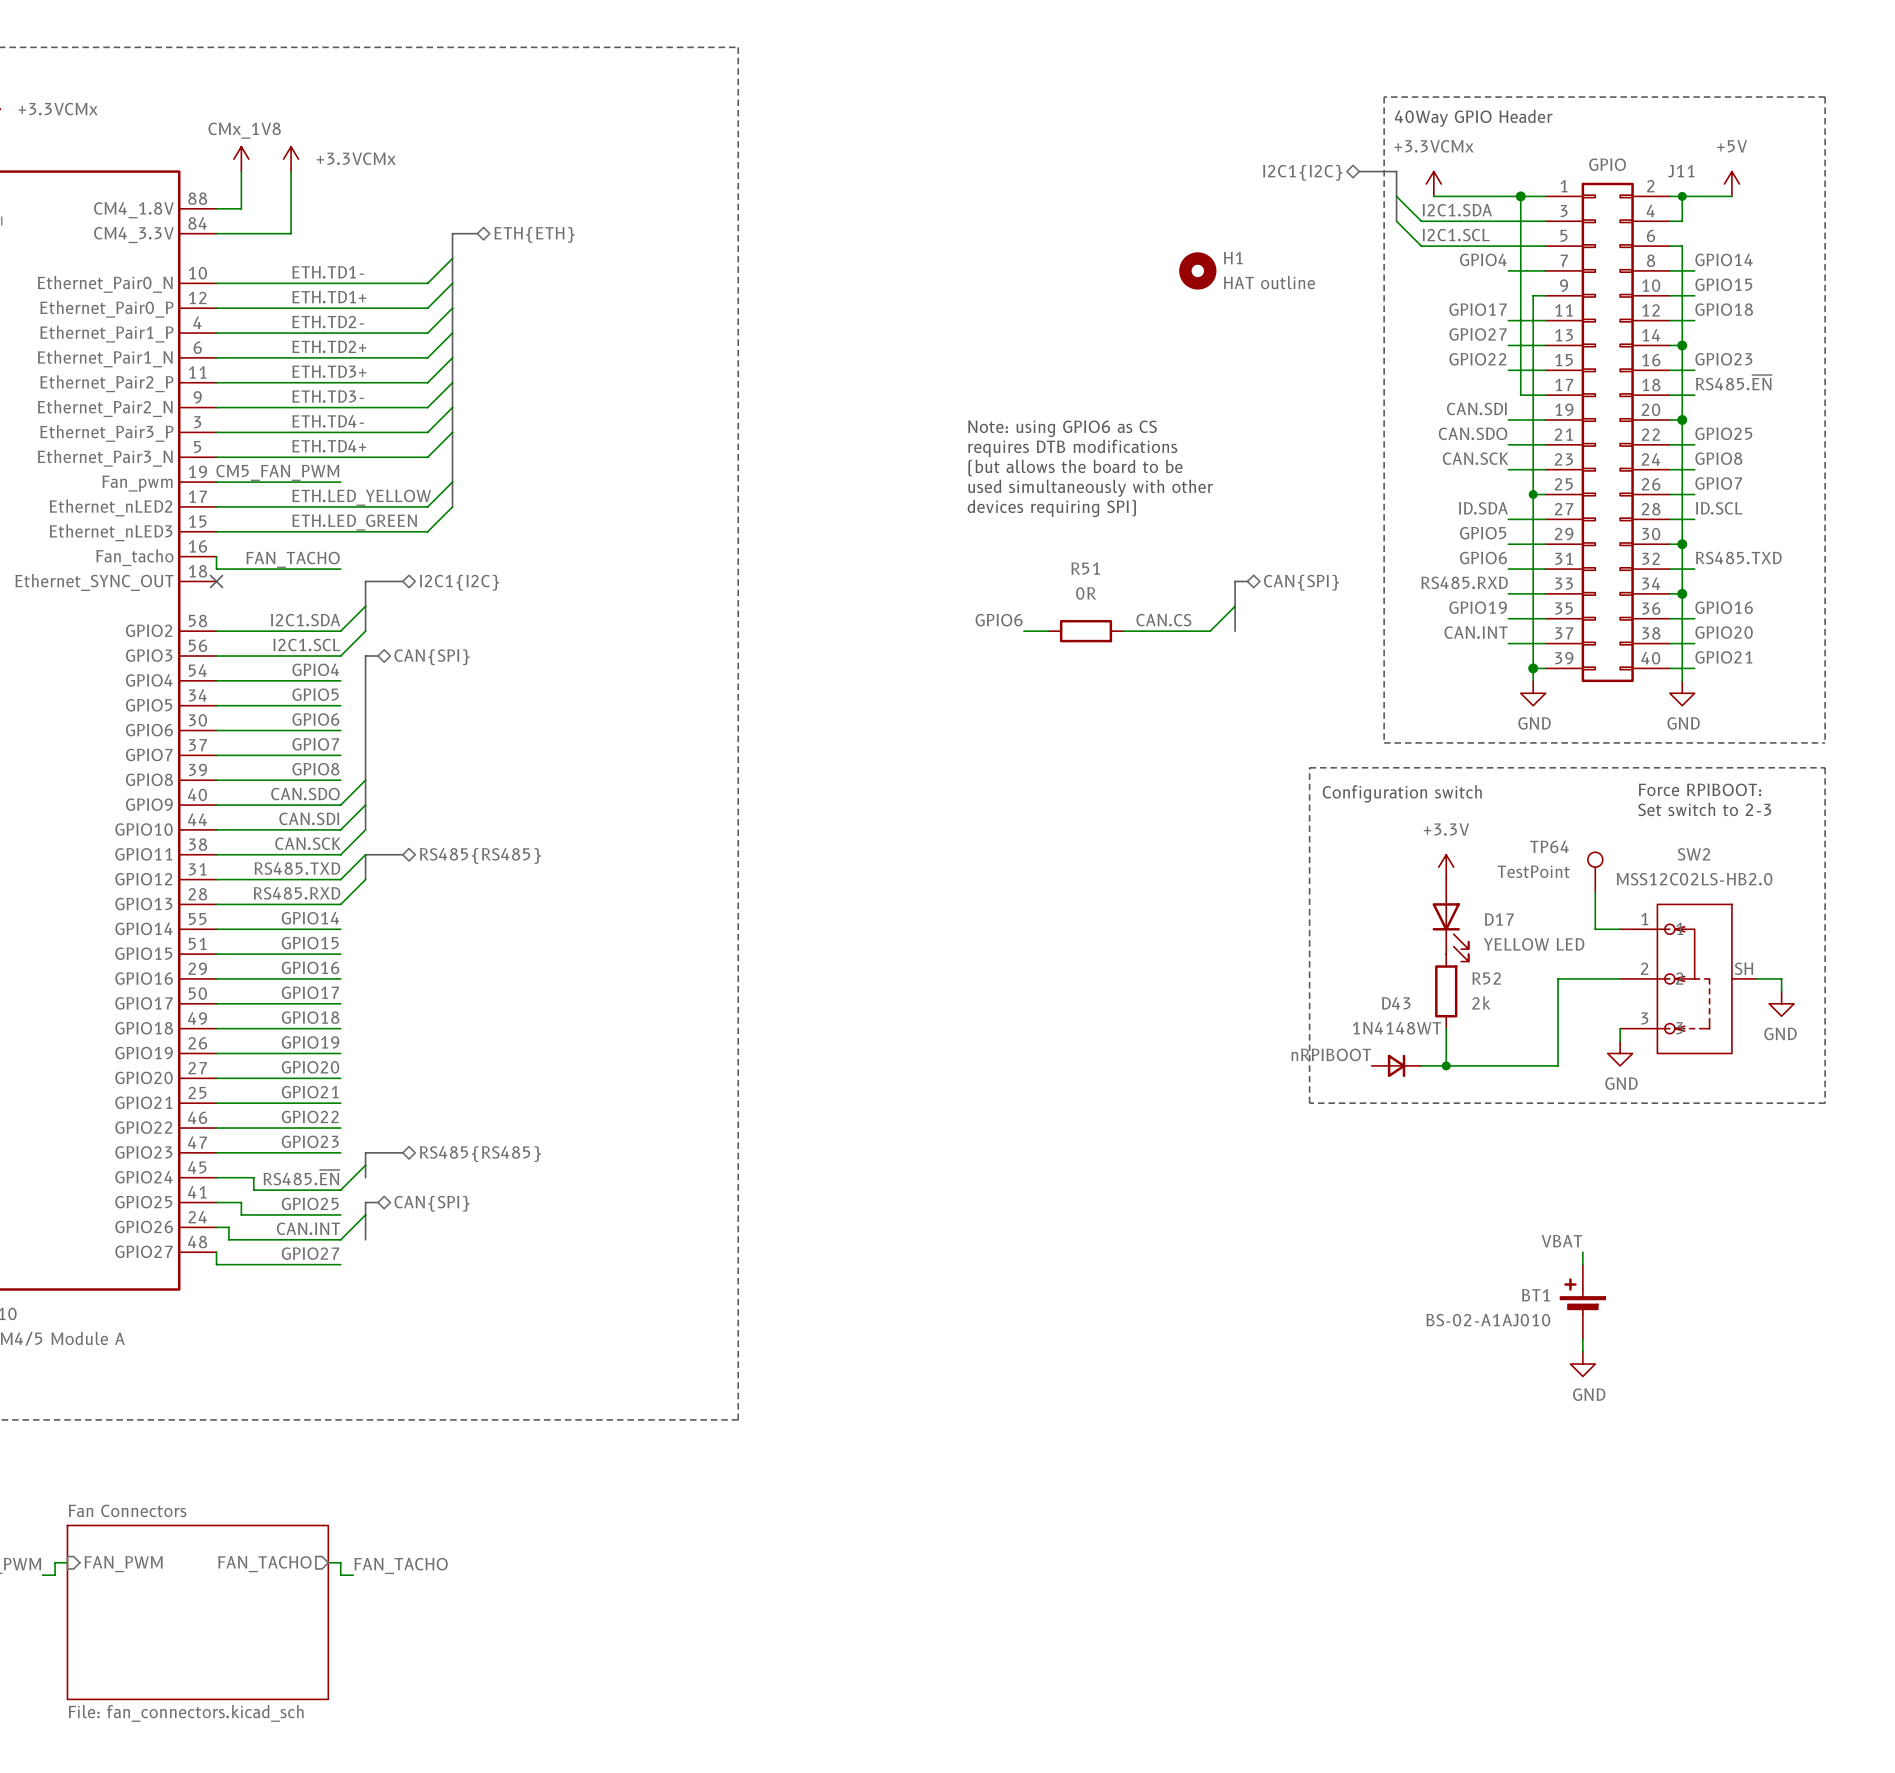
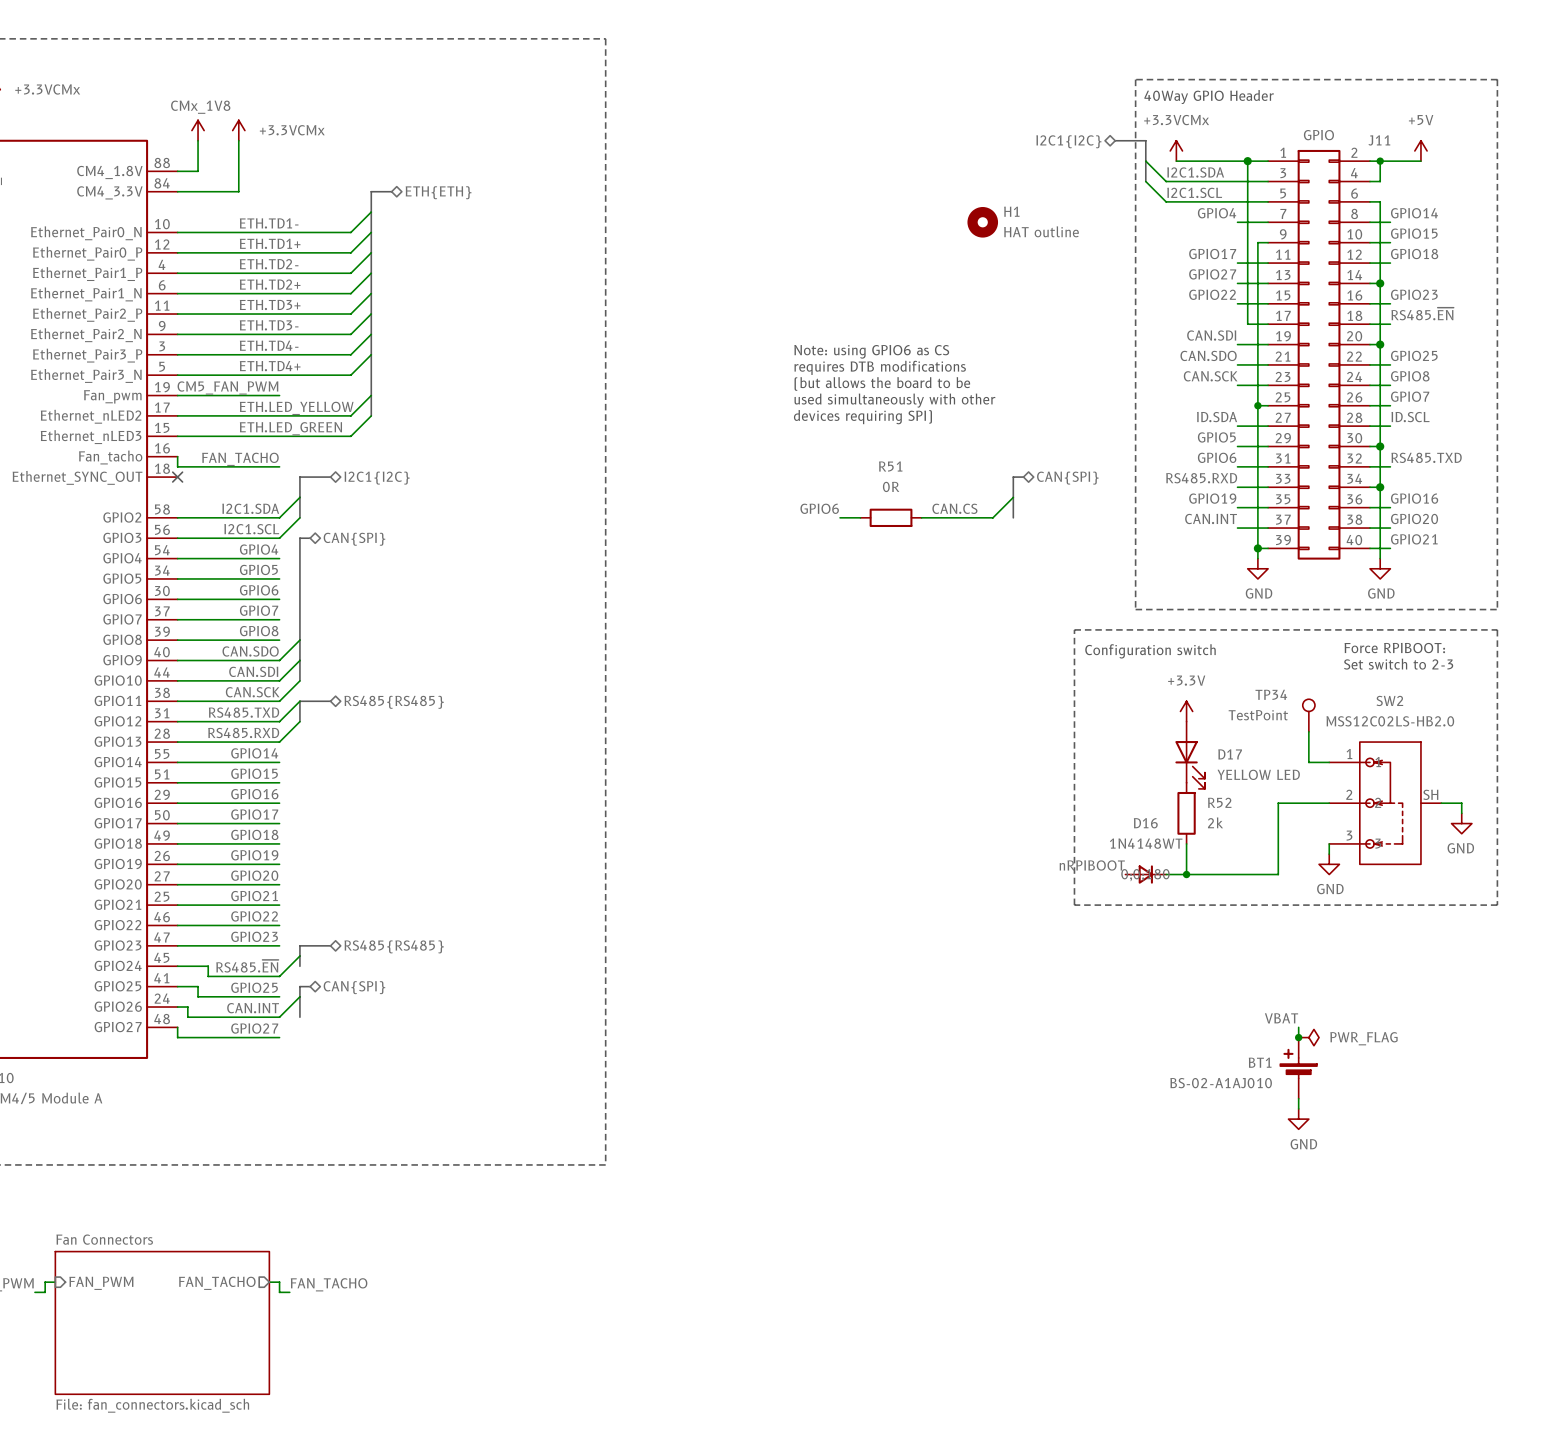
TP64 name: TP64 (1549, 846) -> TP34 (1271, 694)
D43 name: D43 (1396, 1003) -> D16 (1145, 823)
D43 text: none -> 0;0;180 (1145, 875)
junction: none -> (1298, 1037)
power symbol: none -> PWR_FLAG (1308, 1037)

